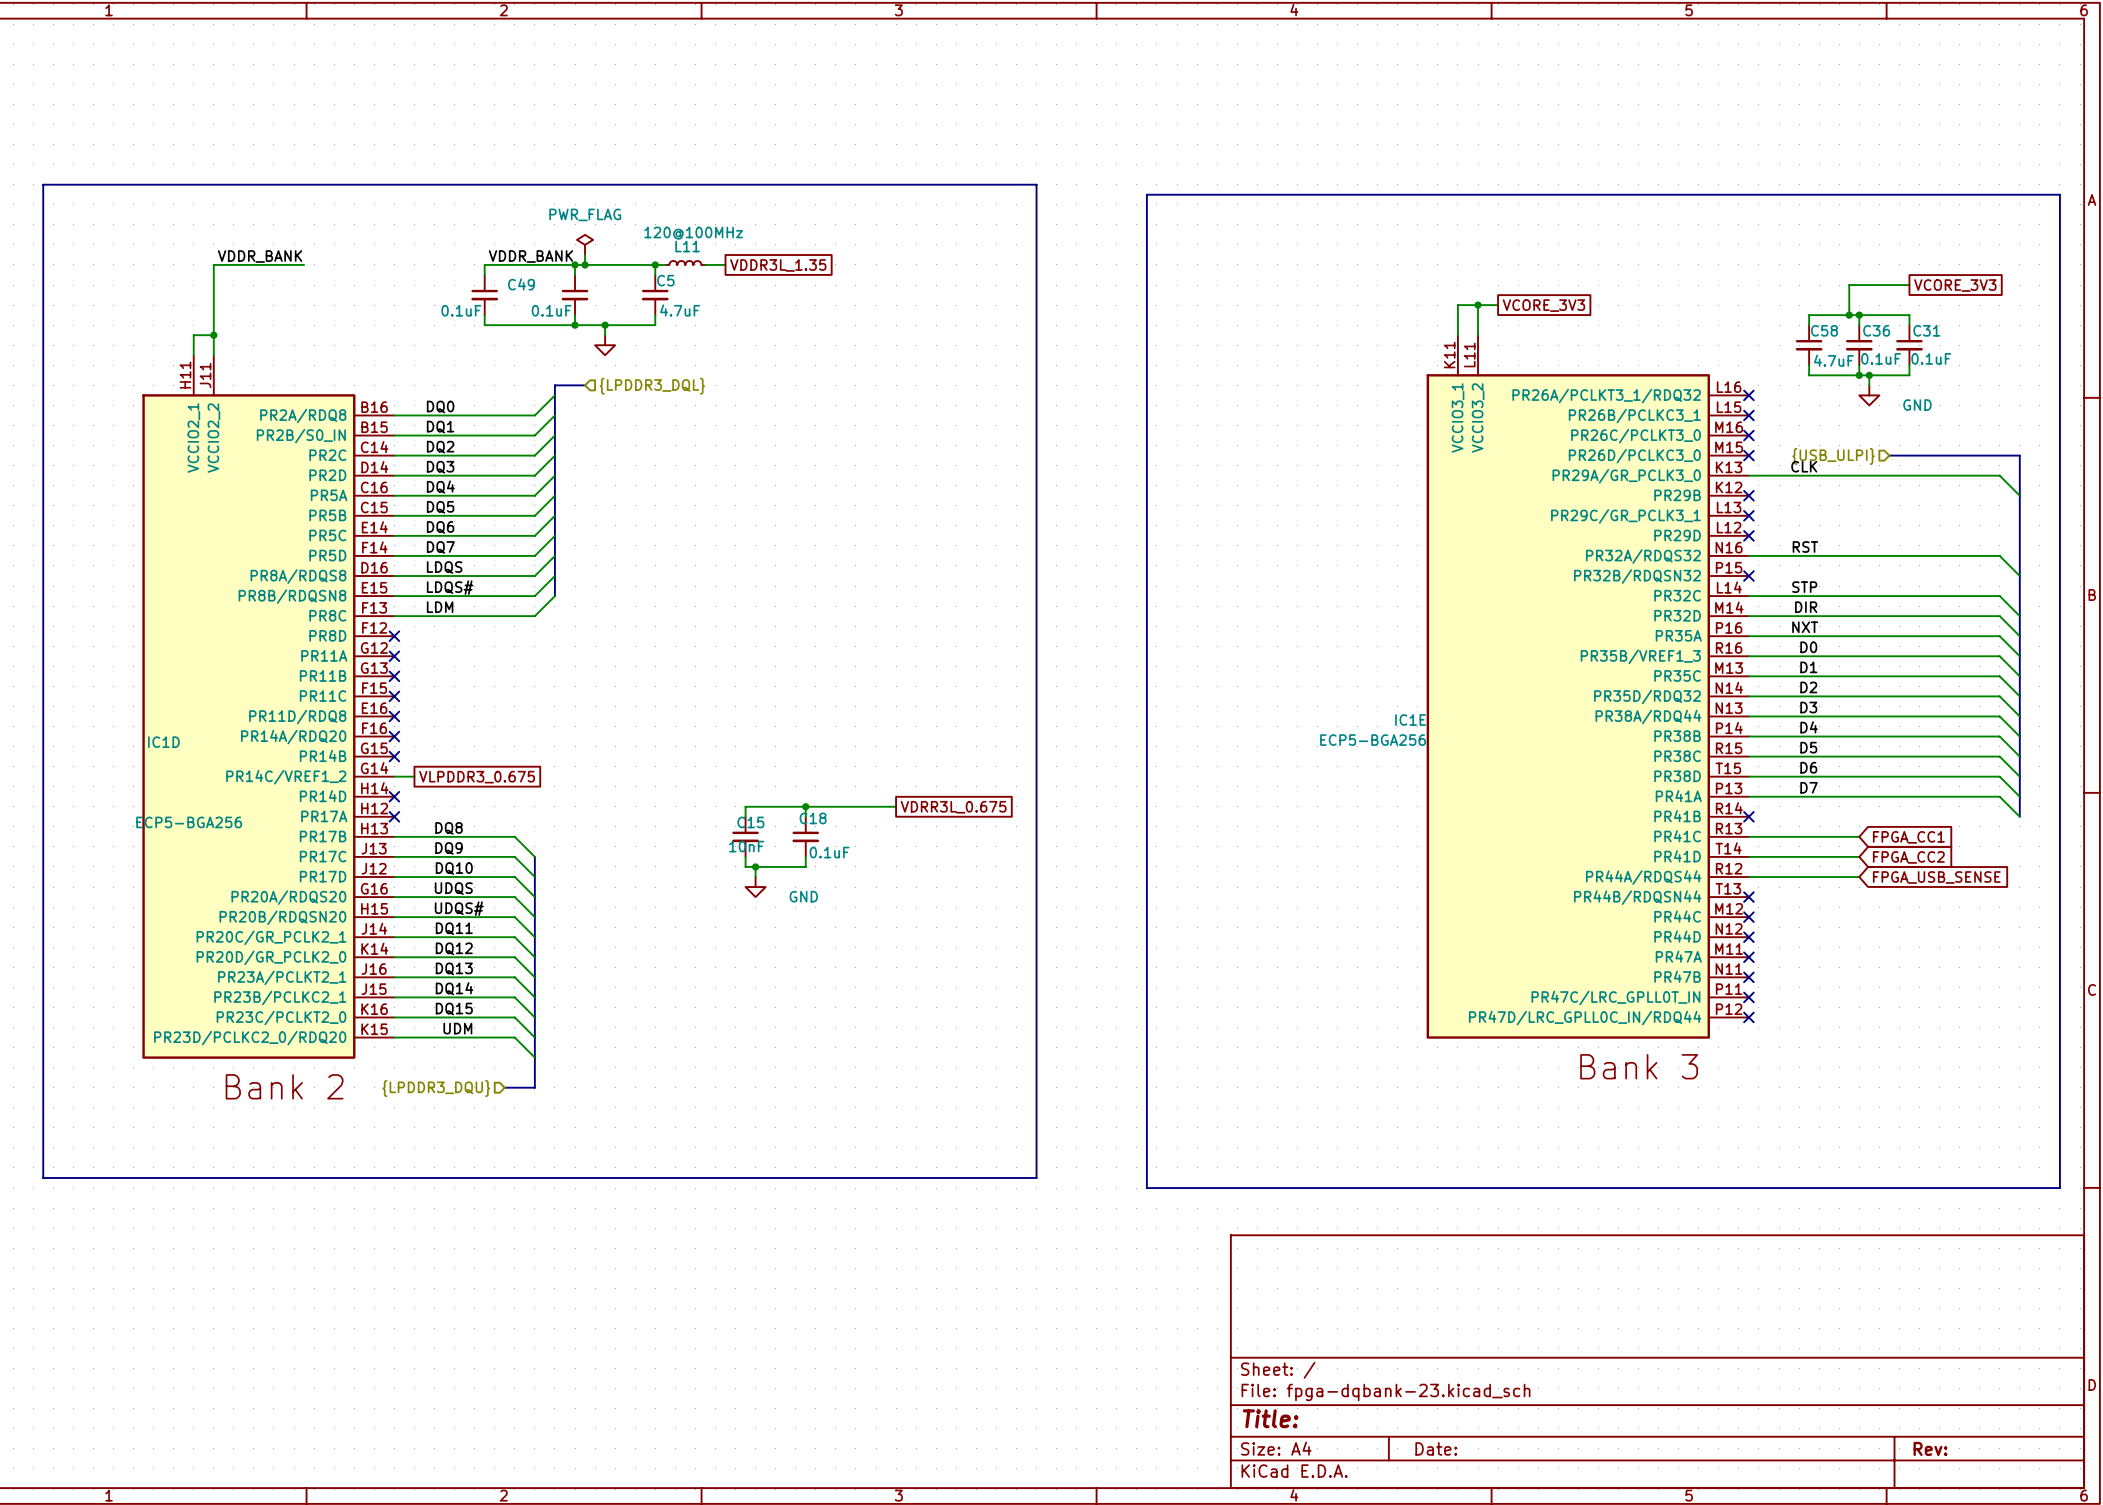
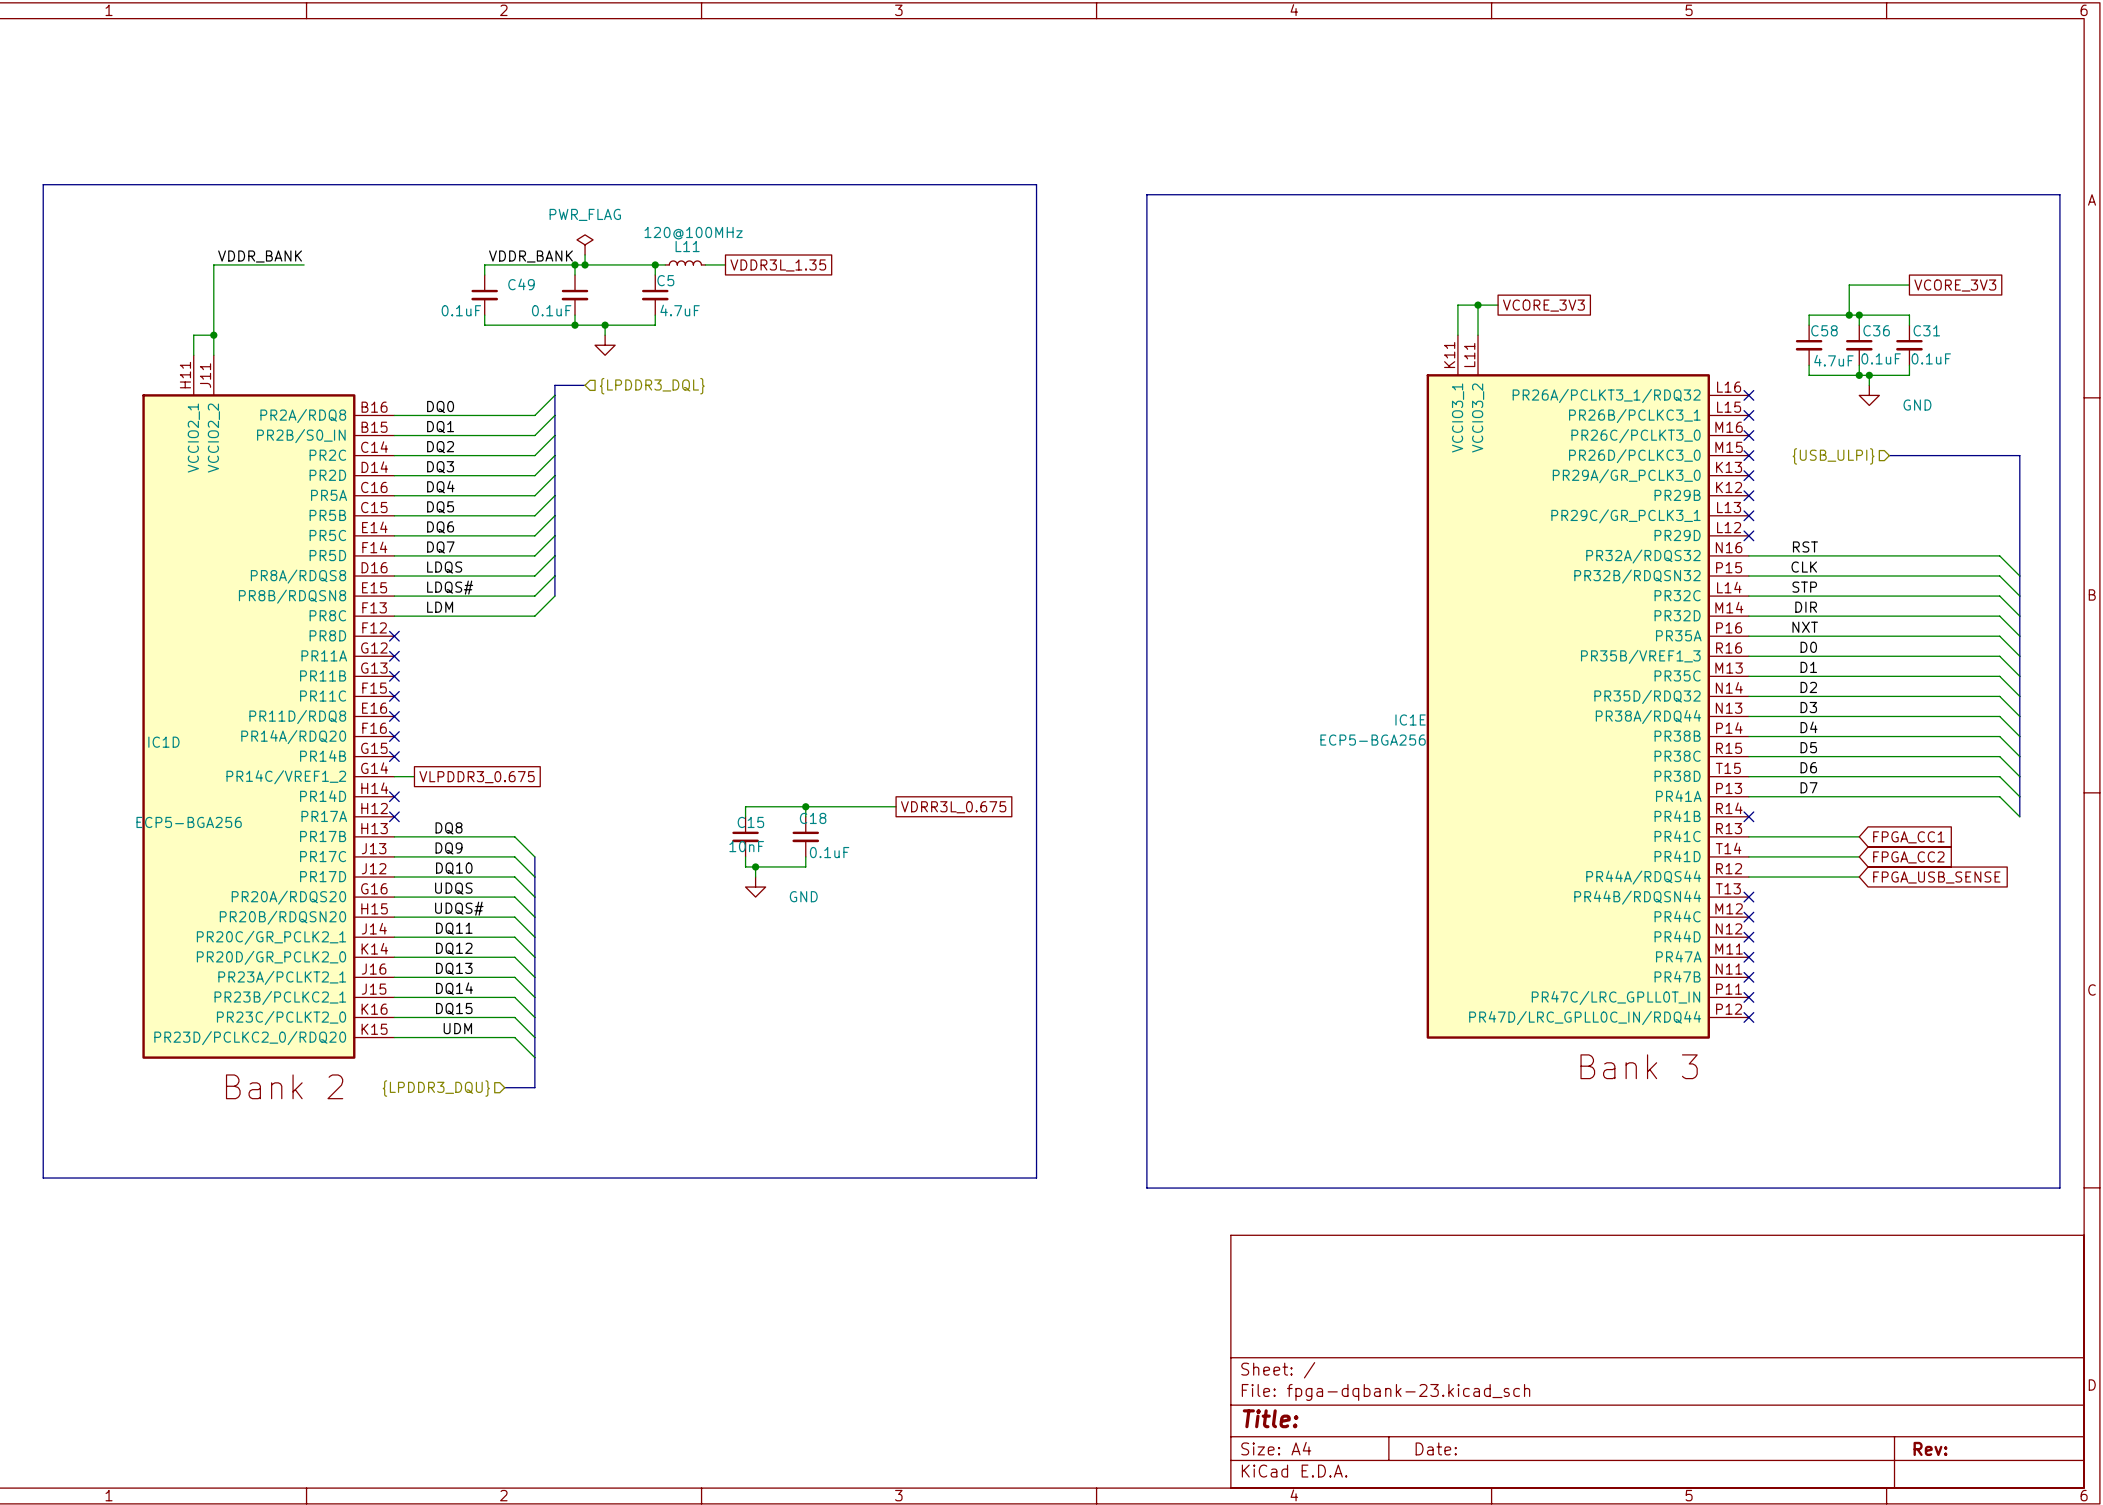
label position: CLK (1804, 466) -> CLK (1804, 567)
wire: (1748, 475) (1999, 475) (2019, 495) -> (1748, 576) (1999, 576) (2019, 596)
no-connect mark: none -> (1748, 475)
no-connect mark: (1748, 576) -> none

